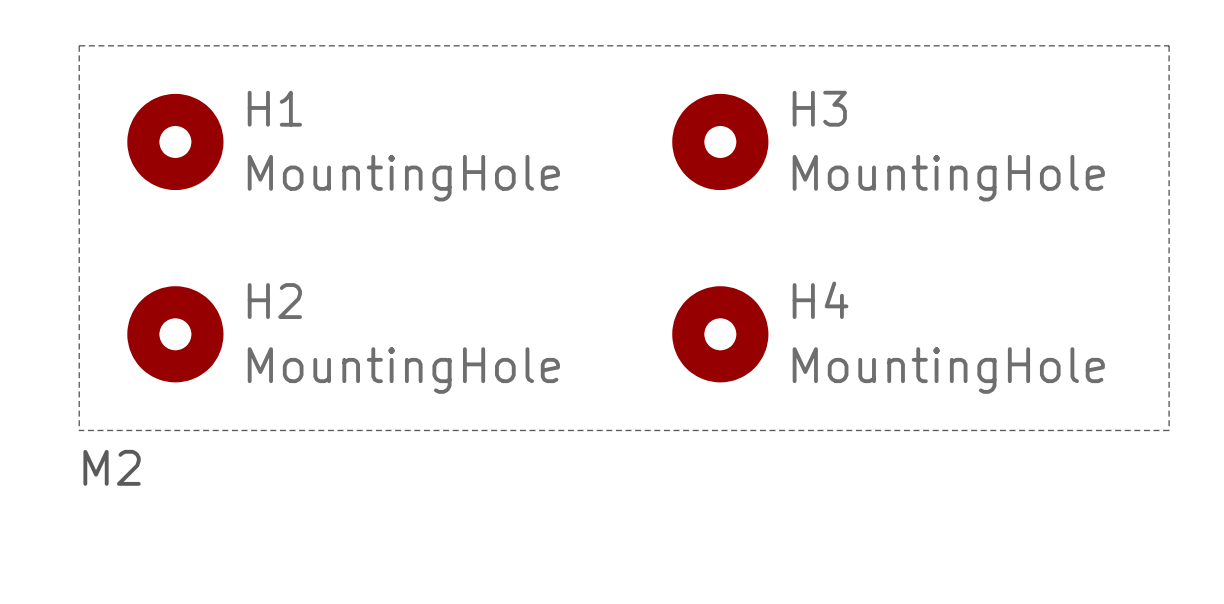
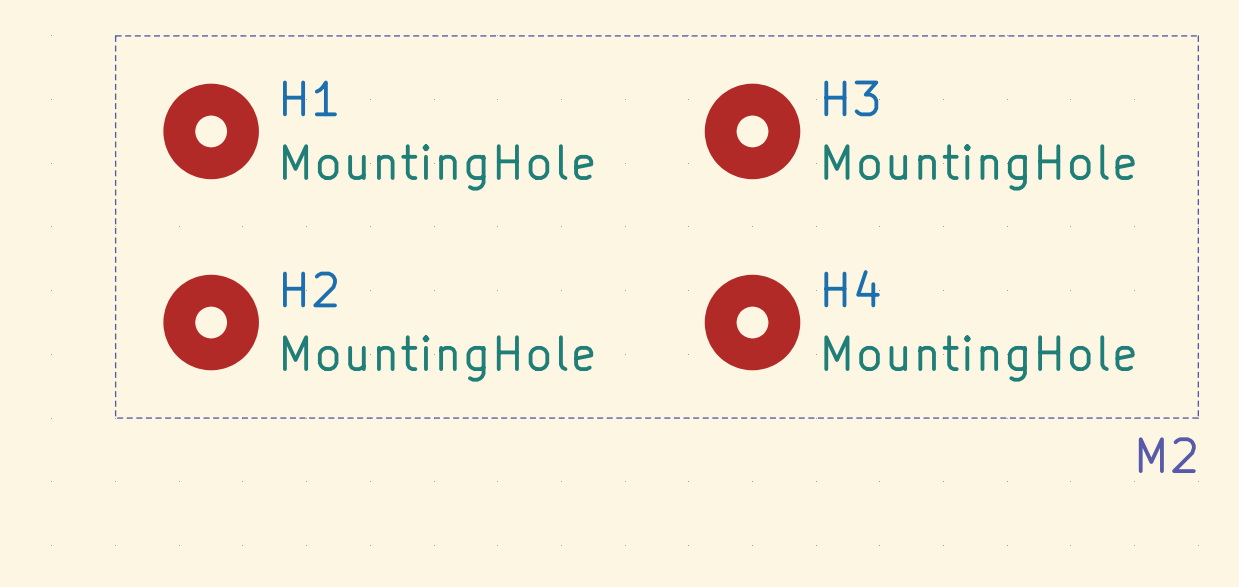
text: M2 (112, 467) -> none
text: none -> M2 (1167, 455)

